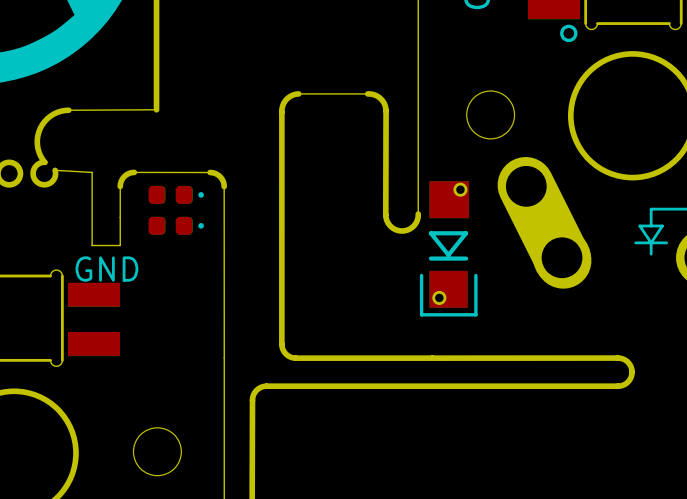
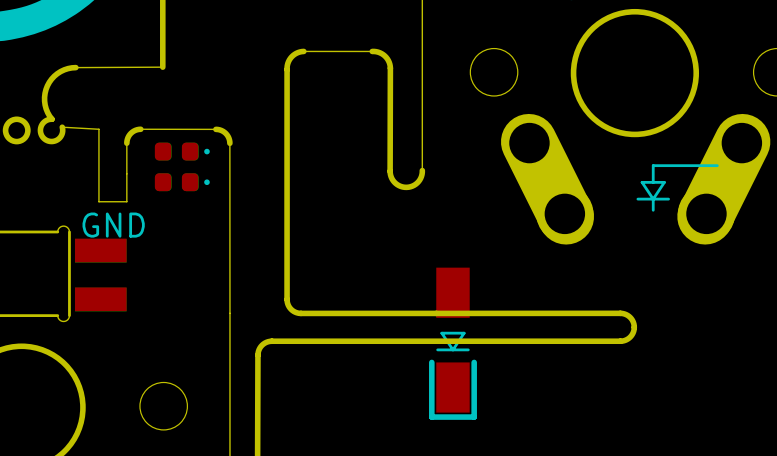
part: (448, 248) -> none
part: none -> (452, 343)

